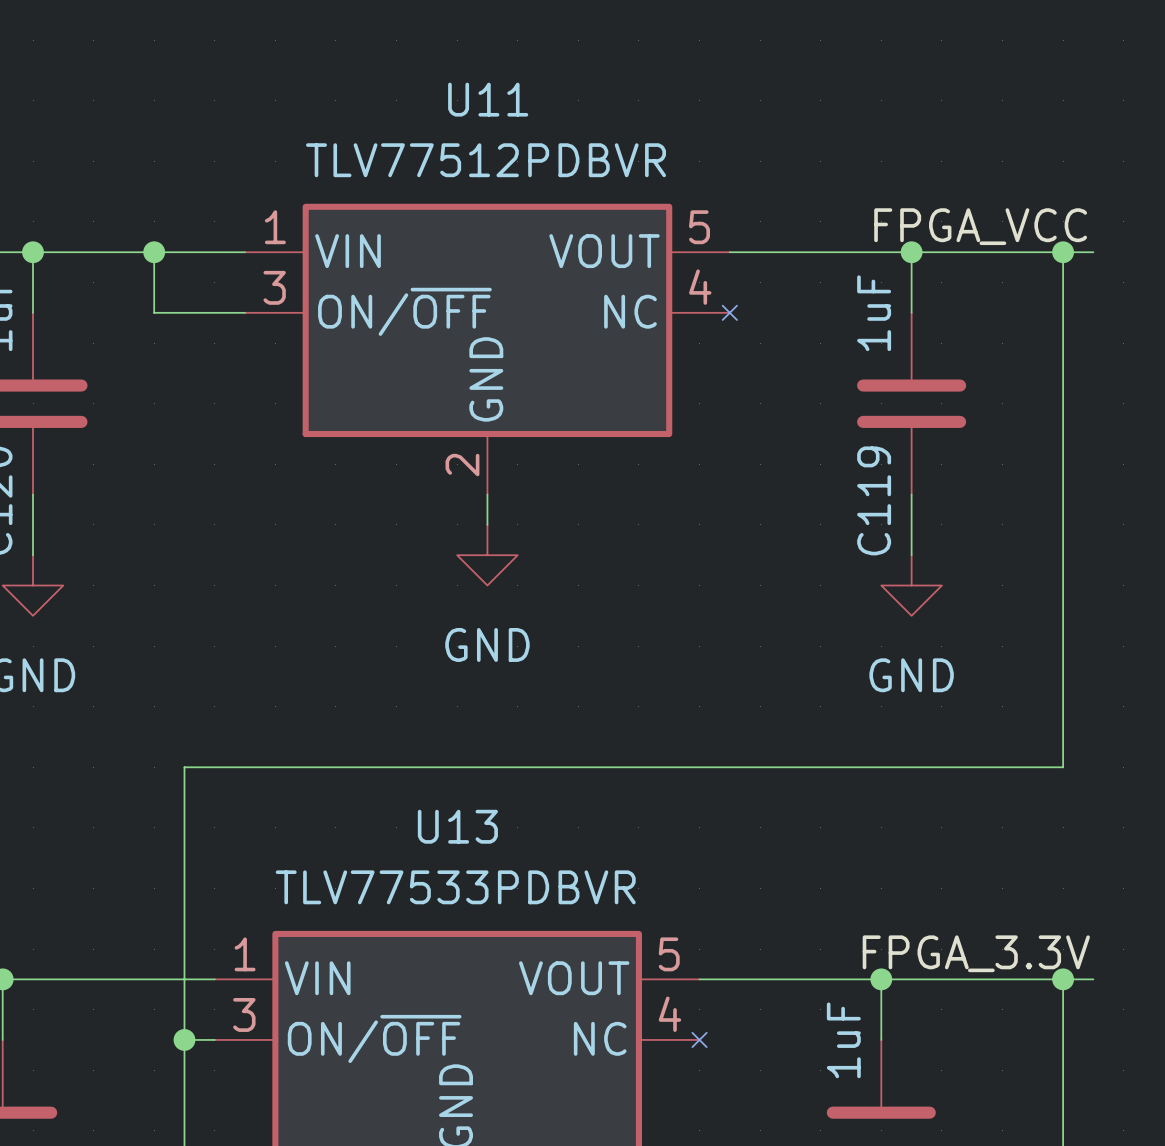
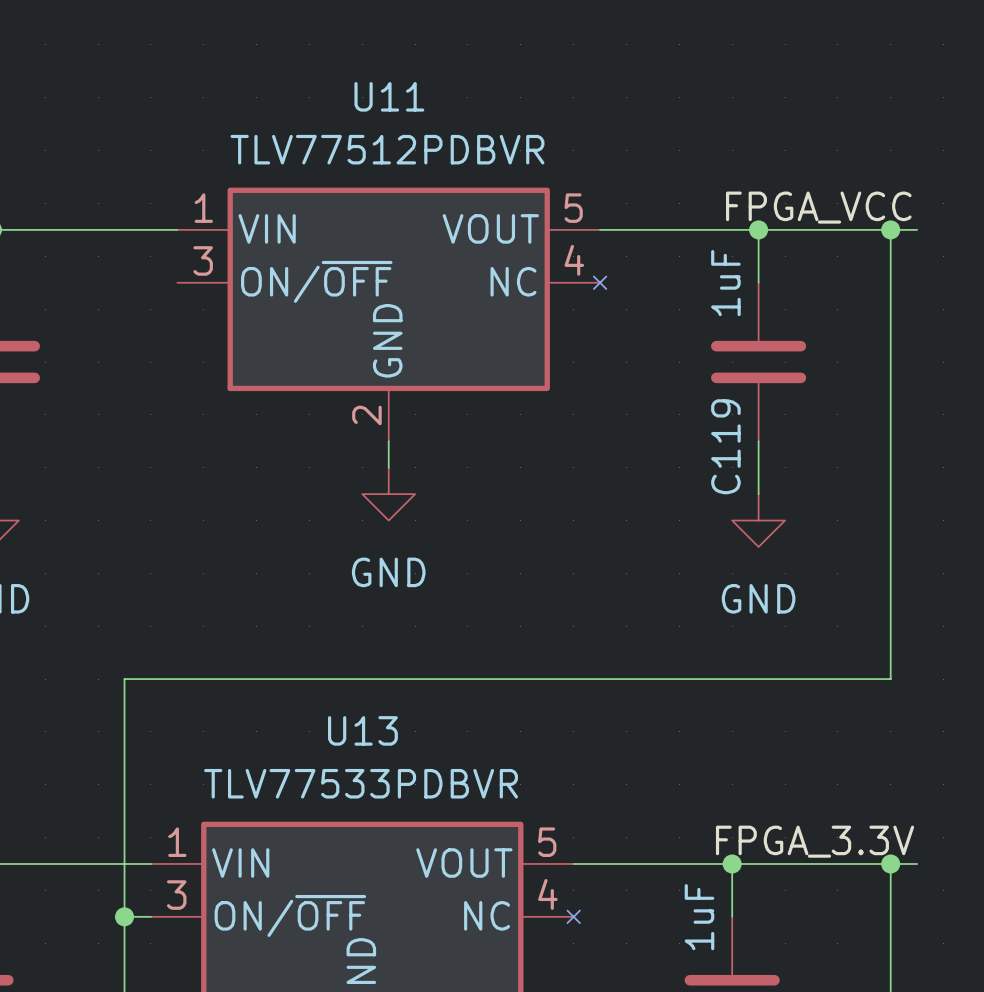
wire: (154, 252) (154, 312) (245, 312) -> none
junction: (154, 252) -> none

